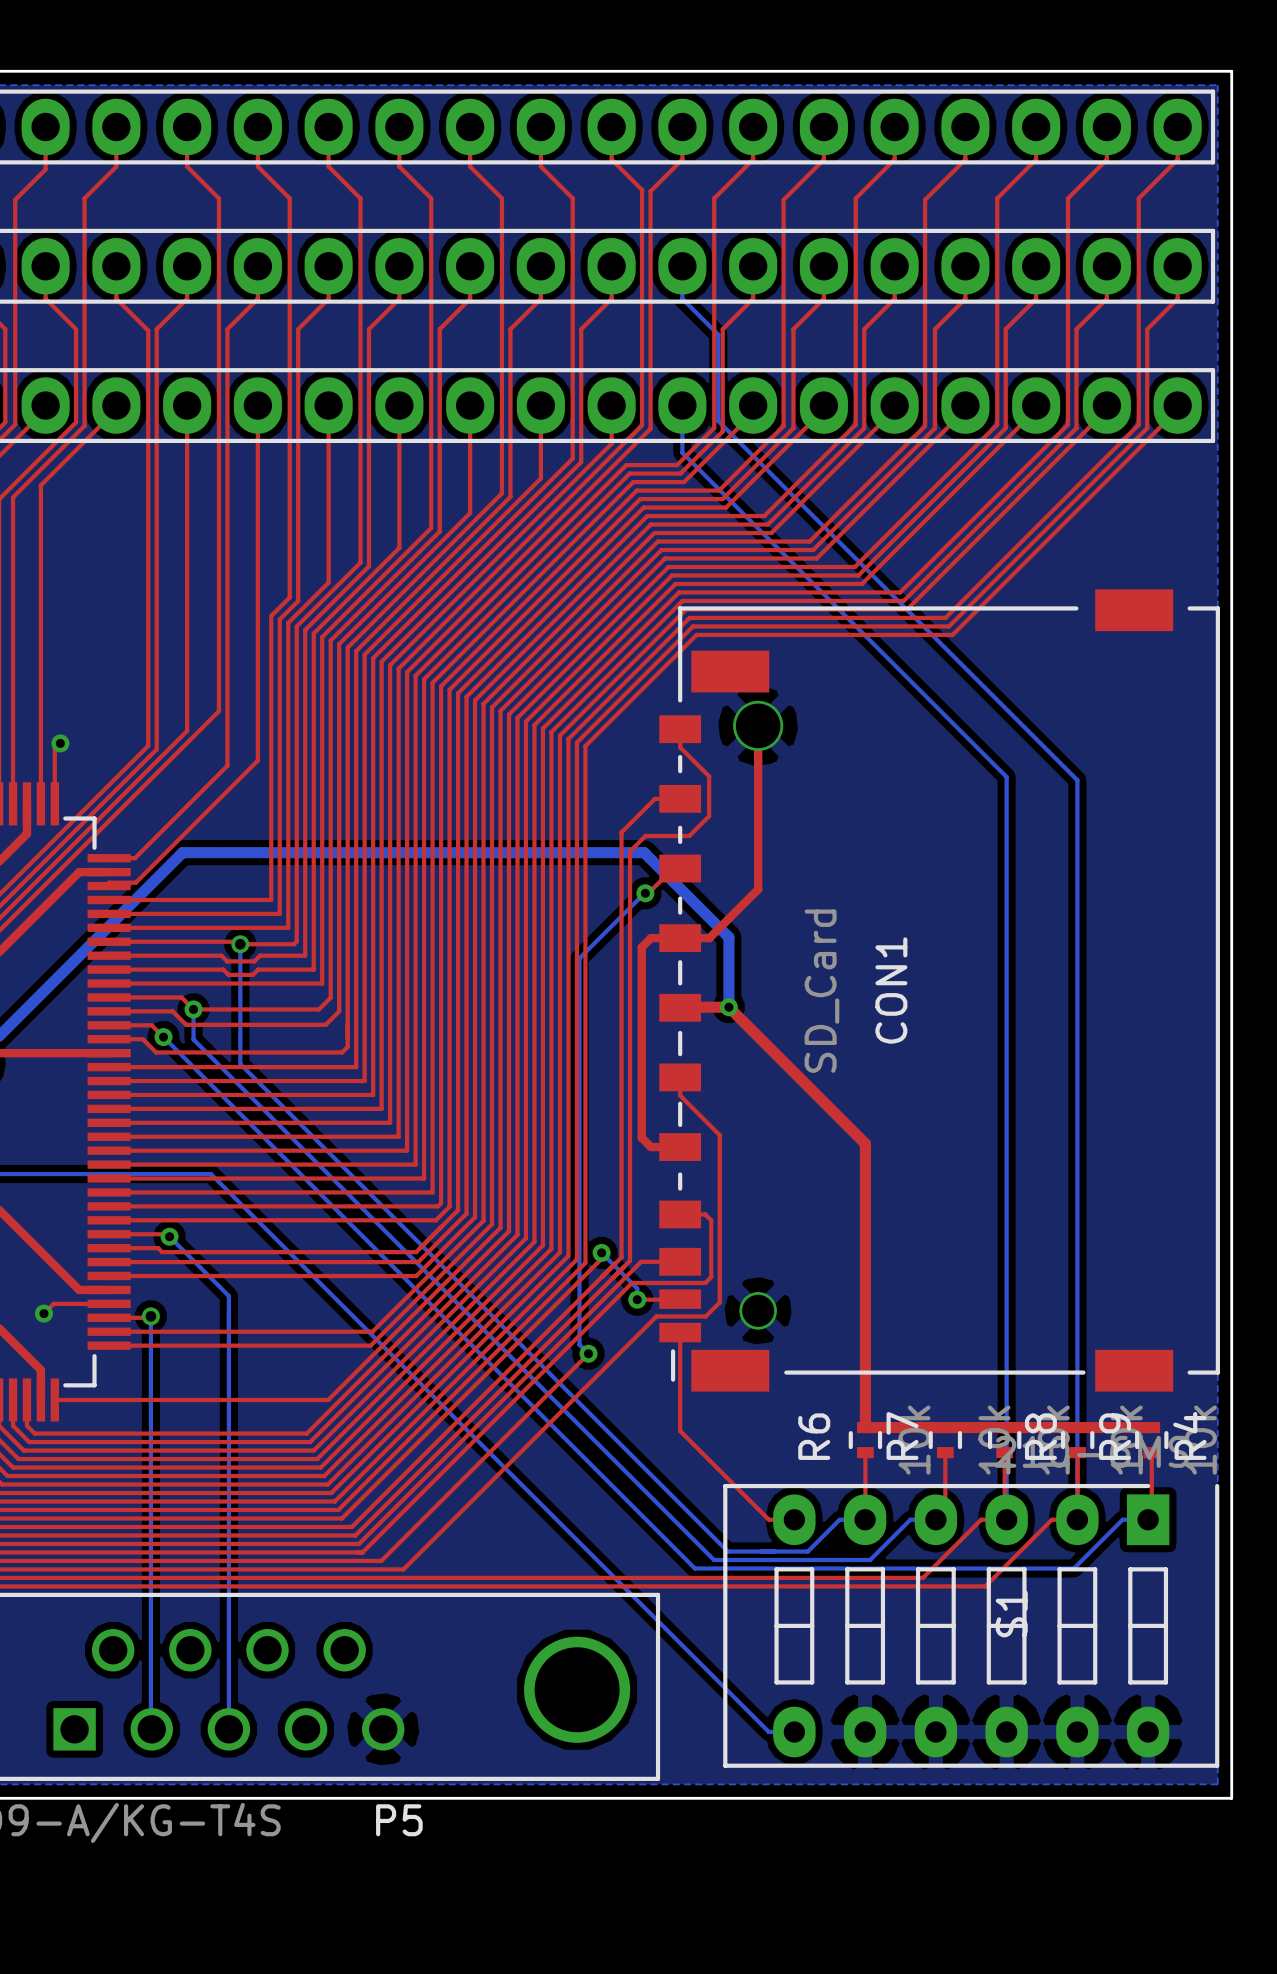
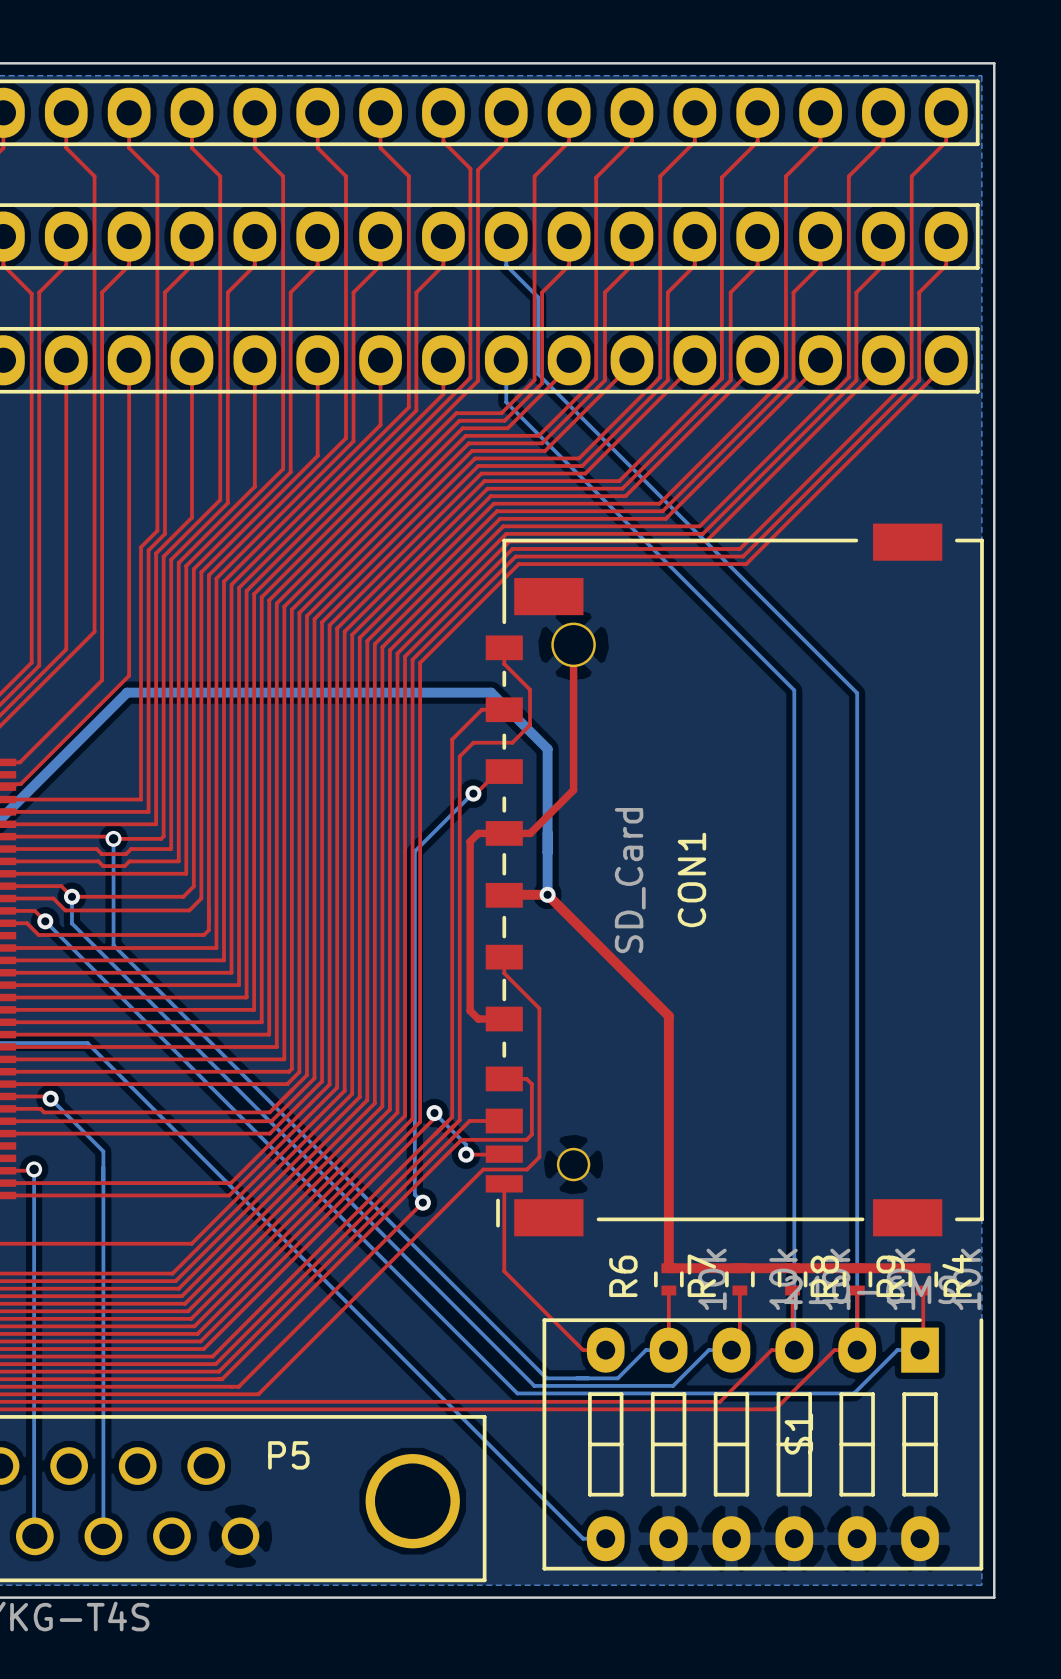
bottom track: (182, 852) (644, 852) (728, 937) -> (62, 757) (127, 692) (491, 692) (547, 749) (547, 832)
P5 name position: P5 (399, 1820) -> P5 (288, 1455)

